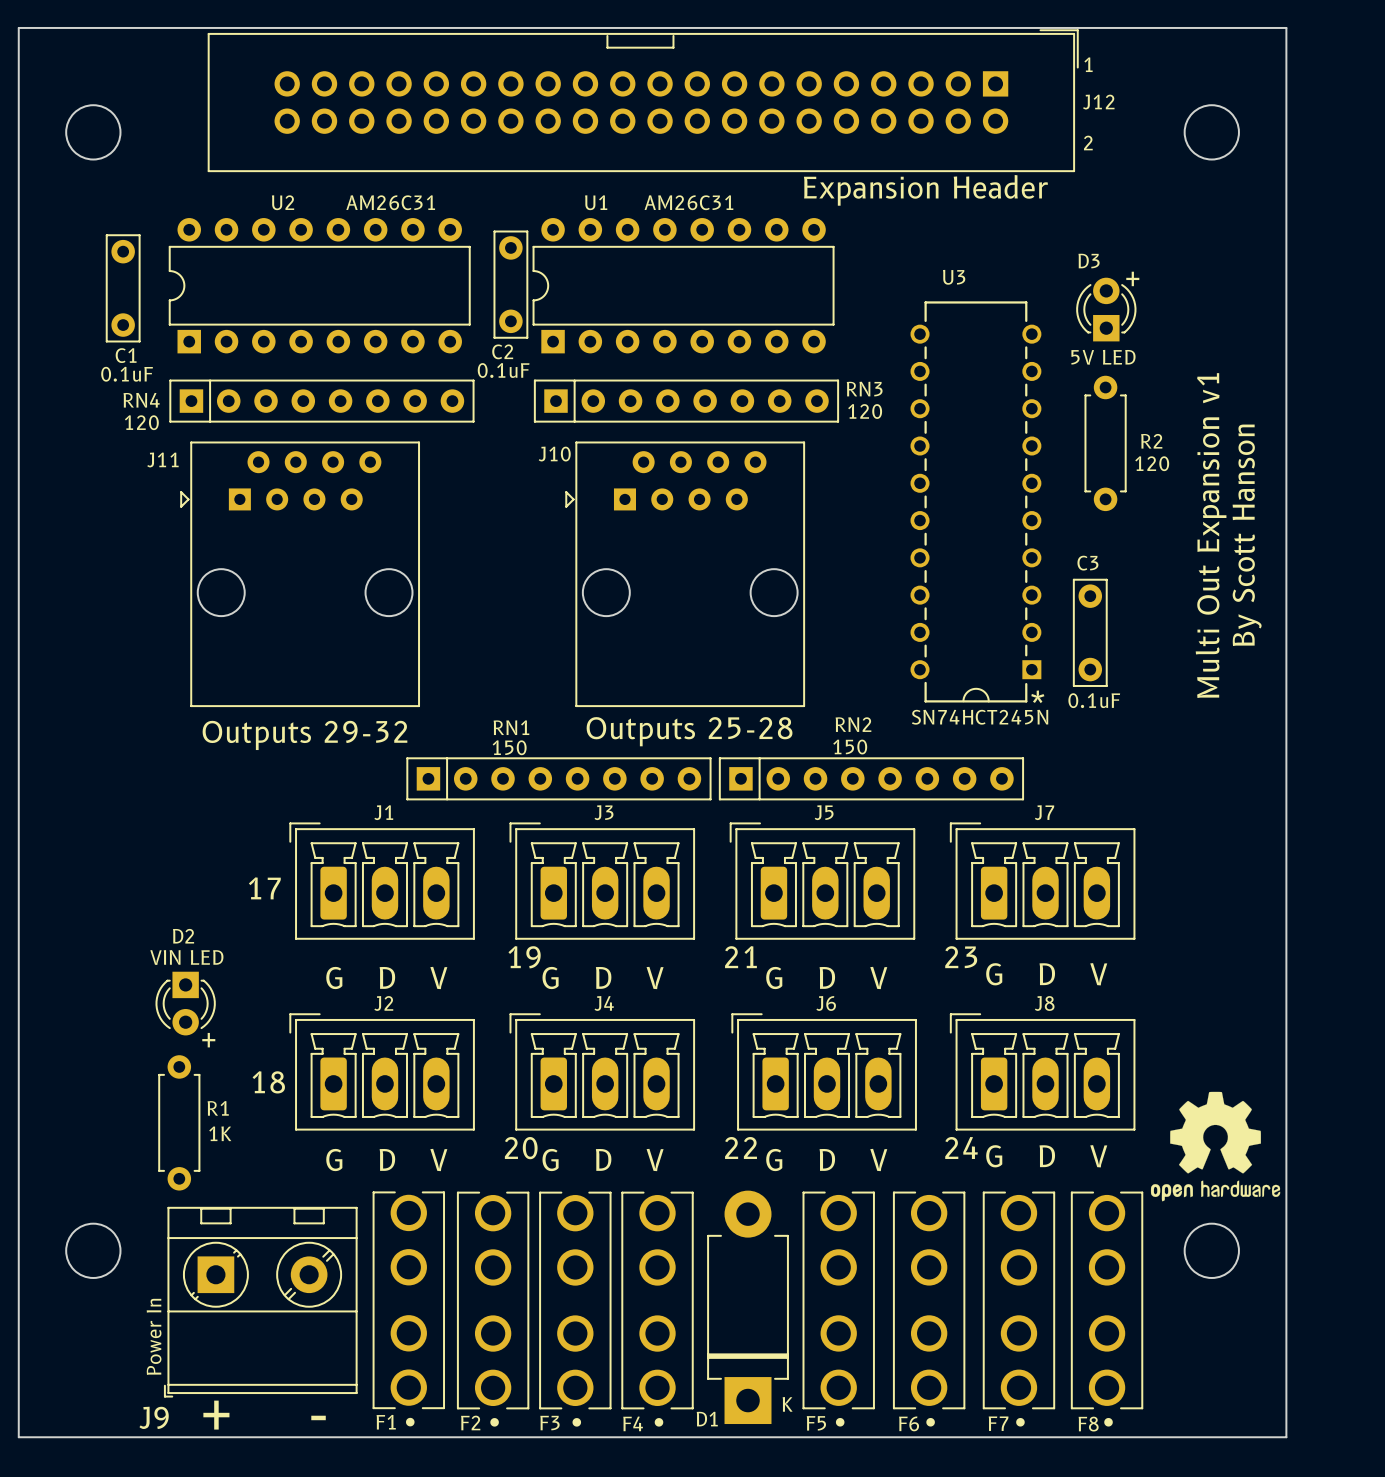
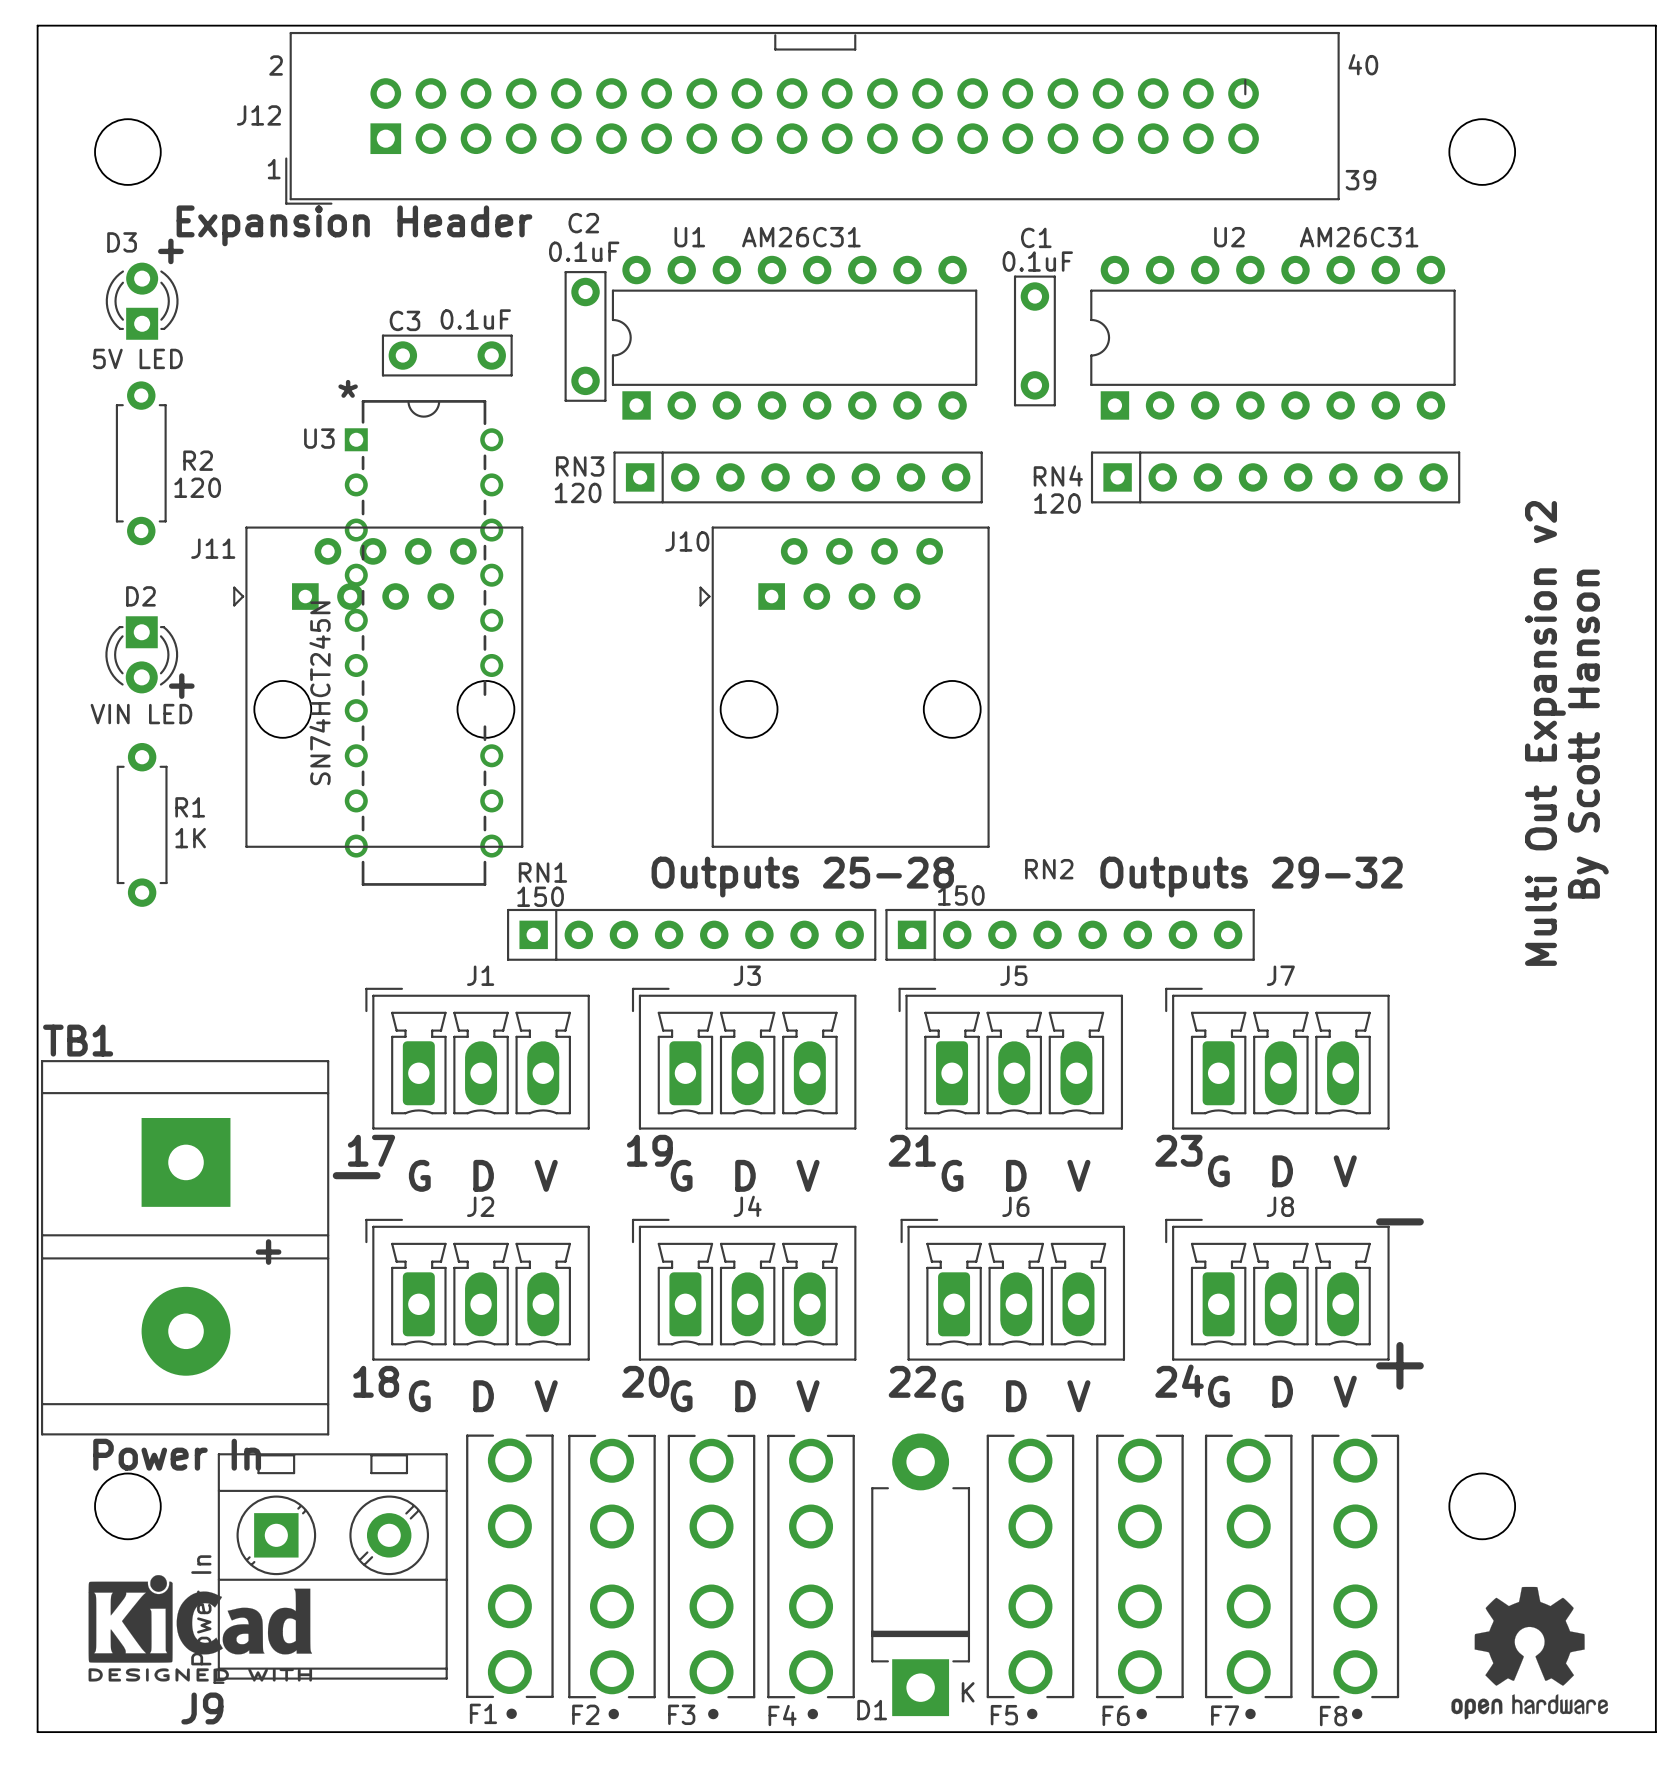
board edge: (1286, 27) (1286, 1437) -> (1572, 25) (1655, 25) (1655, 1732) (1572, 1732)
line: (607, 35) (607, 47) (627, 47) -> (775, 35) (775, 49)
line: (673, 35) (673, 47) -> (855, 35) (855, 49) (830, 49)
text: none -> 2 (276, 65)
text: none -> 40 (1363, 64)
text: 1 (1088, 64) -> none
line: none -> (1245, 80) (1245, 94)
J12 rotation: 0° (643, 100) -> 180° (812, 118)
text: 2 (1088, 143) -> none
text: none -> 1 (274, 169)
text: none -> 39 (1360, 180)
J12 value position: Expansion Header (925, 190) -> Expansion Header (354, 225)
text: none -> + (170, 251)
U3 name position: U3 (954, 277) -> U3 (319, 438)
text: + (1132, 278) -> none
C2 position: (510, 284) -> (585, 336)
U2 position: (319, 285) -> (1272, 337)
U1 position: (683, 285) -> (794, 337)
C1 position: (123, 288) -> (1034, 340)
D3 position: (1106, 309) -> (142, 301)
C2 name position: C2 (502, 351) -> C2 (583, 223)
C1 name position: C1 (126, 355) -> C1 (1036, 237)
C2 value position: 0.1uF (503, 370) -> 0.1uF (584, 251)
C1 value position: 0.1uF (127, 374) -> 0.1uF (1037, 261)
RN3 name position: RN3 (864, 389) -> RN3 (580, 466)
RN4 position: (321, 401) -> (1275, 477)
RN3 position: (686, 401) -> (798, 477)
RN3 value position: 120 (865, 411) -> 120 (578, 492)
R2 position: (1105, 443) -> (141, 463)
U3 rotation: 0° (975, 501) -> 180° (424, 642)
U3 position: (975, 501) -> (424, 642)
text: Multi Out Expansion v1 (1211, 535) -> none
text position: By Scott Hanson (1247, 535) -> By Scott Hanson (1588, 734)
C3 name position: C3 (1087, 563) -> C3 (404, 320)
text: none -> + (181, 686)
text: none -> Multi Out Expansion v2 (1545, 733)
C3 rotation: 0° (1090, 632) -> 90° clockwise (447, 355)
C3 position: (1090, 632) -> (447, 355)
C3 value position: 0.1uF (1094, 700) -> 0.1uF (475, 319)
U3 value position: SN74HCT245N (980, 717) -> SN74HCT245N (320, 693)
RN1 name position: RN1 (511, 727) -> RN1 (542, 872)
text position: Outputs 25-28 (689, 731) -> Outputs 25-28 (802, 877)
text: none -> Outputs 29-32 (1251, 877)
text: Outputs 29-32 (304, 735) -> none
RN1 value position: 150 (509, 747) -> 150 (540, 896)
RN2 value position: 150 (850, 747) -> 150 (961, 895)
text position: 17 (264, 888) -> 17 (371, 1150)
D2 name position: D2 (183, 936) -> D2 (140, 596)
D2 value position: VIN LED (186, 957) -> VIN LED (141, 714)
text: none -> - (356, 1175)
D2 position: (185, 1003) -> (141, 654)
text: none -> - (1399, 1221)
TB1: none -> Power In (185, 1247)
text position: 18 (268, 1082) -> 18 (376, 1381)
R1 position: (179, 1122) -> (142, 824)
text: none -> + (1399, 1365)
drawing position: (1215, 1146) -> (1529, 1653)
drawing: none -> [88, 1575, 313, 1682]
text: + (216, 1415) -> none
text: - (318, 1417) -> none

